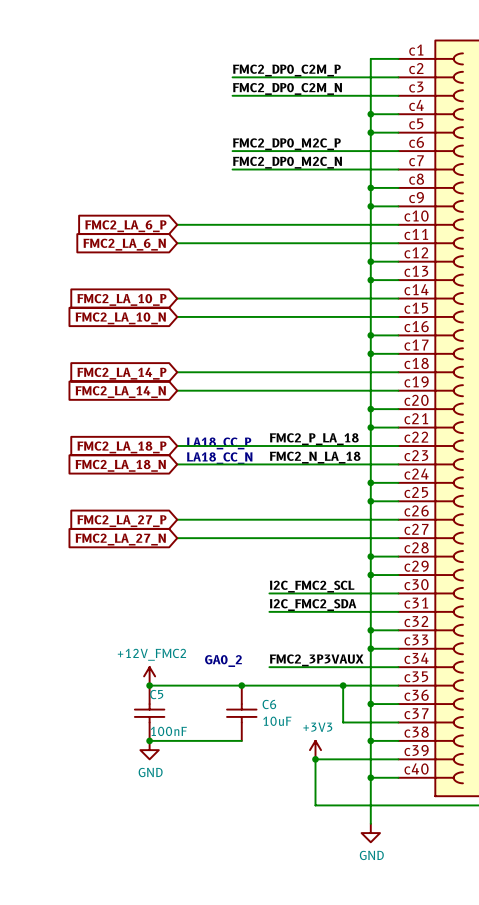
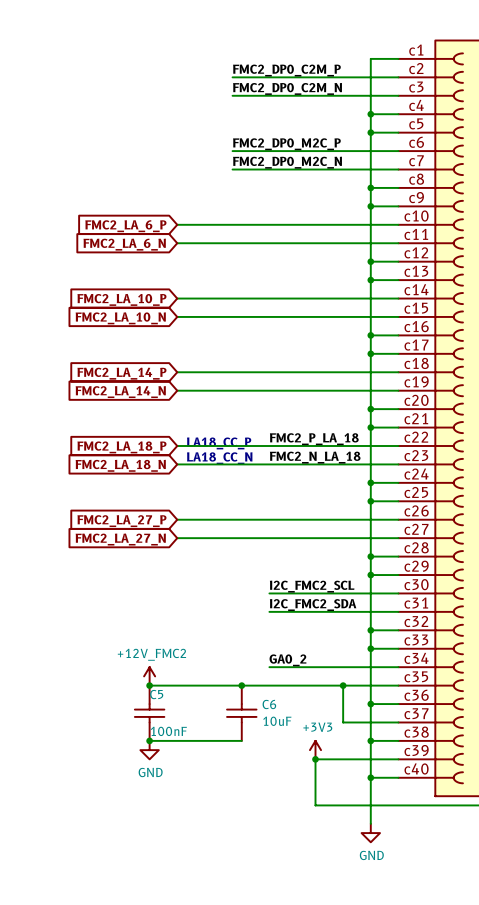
label: FMC2_3P3VAUX (316, 660) -> GA0_2 (287, 660)
text: GA0_2 (223, 661) -> none

